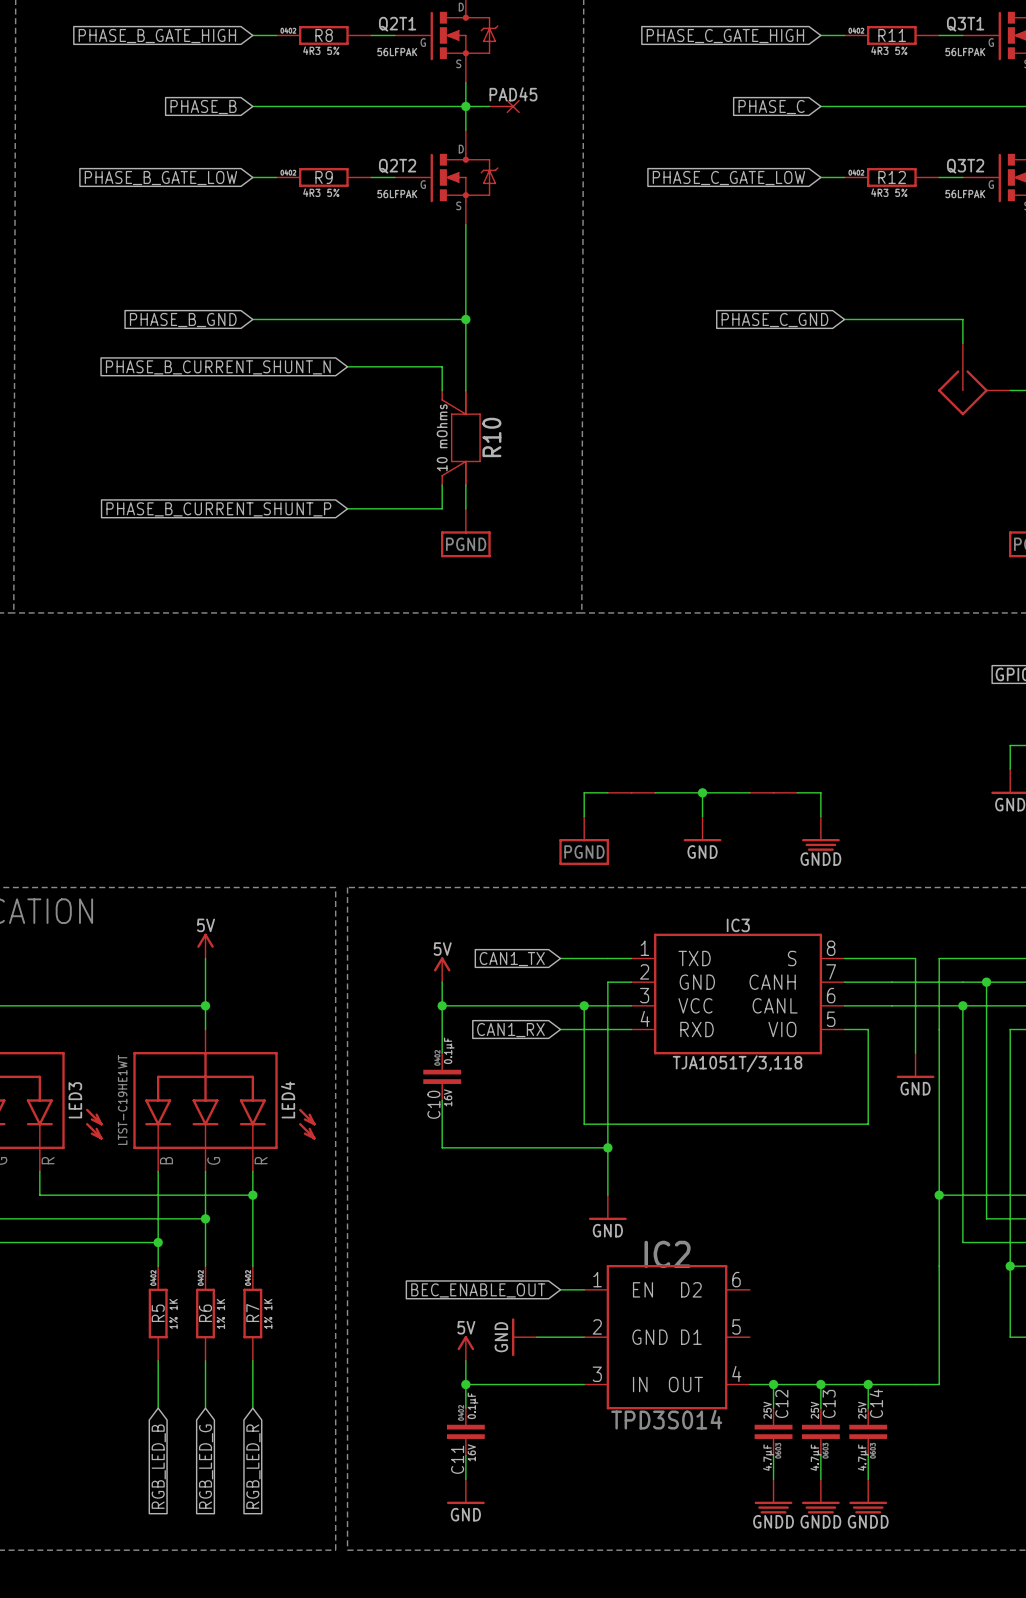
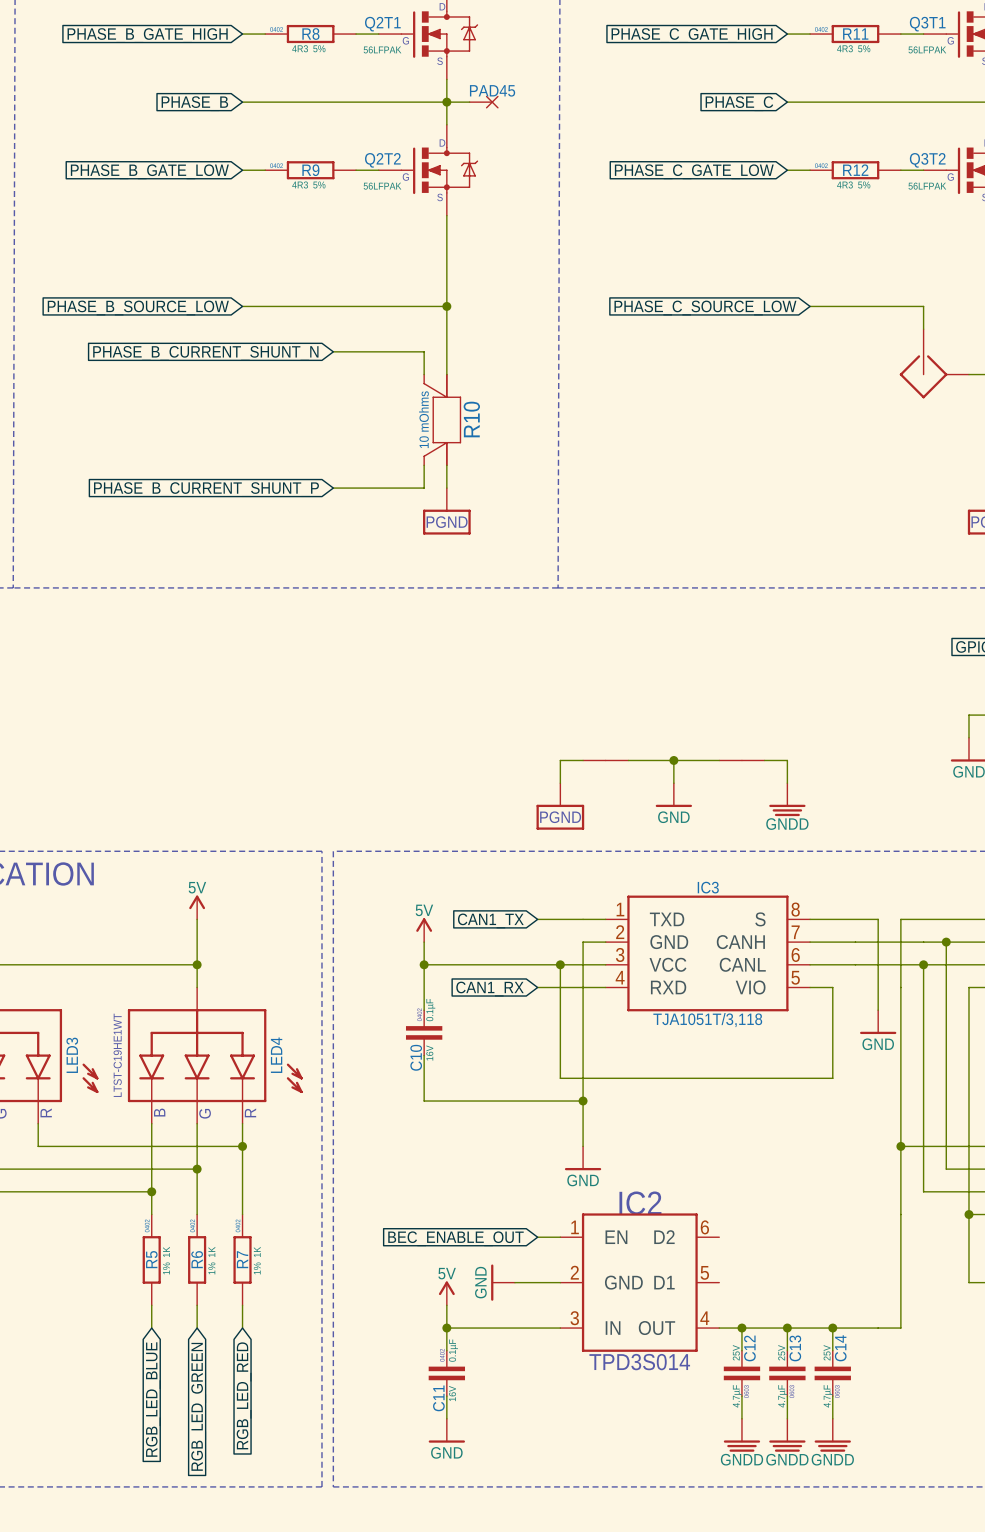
global label: PHASE_B_GND (183, 320) -> PHASE_B_SOURCE_LOW (138, 308)
global label: PHASE_C_GND (774, 320) -> PHASE_C_SOURCE_LOW (705, 308)
wire: (158, 1384) (158, 1408) -> none
wire: (205, 1384) (205, 1408) -> none
wire: (252, 1384) (252, 1408) -> none
global label: RGB_LED_B (158, 1466) -> RGB_LED_BLUE (153, 1399)
global label: RGB_LED_G (206, 1466) -> RGB_LED_GREEN (198, 1406)
global label: RGB_LED_R (253, 1466) -> RGB_LED_RED (244, 1395)

